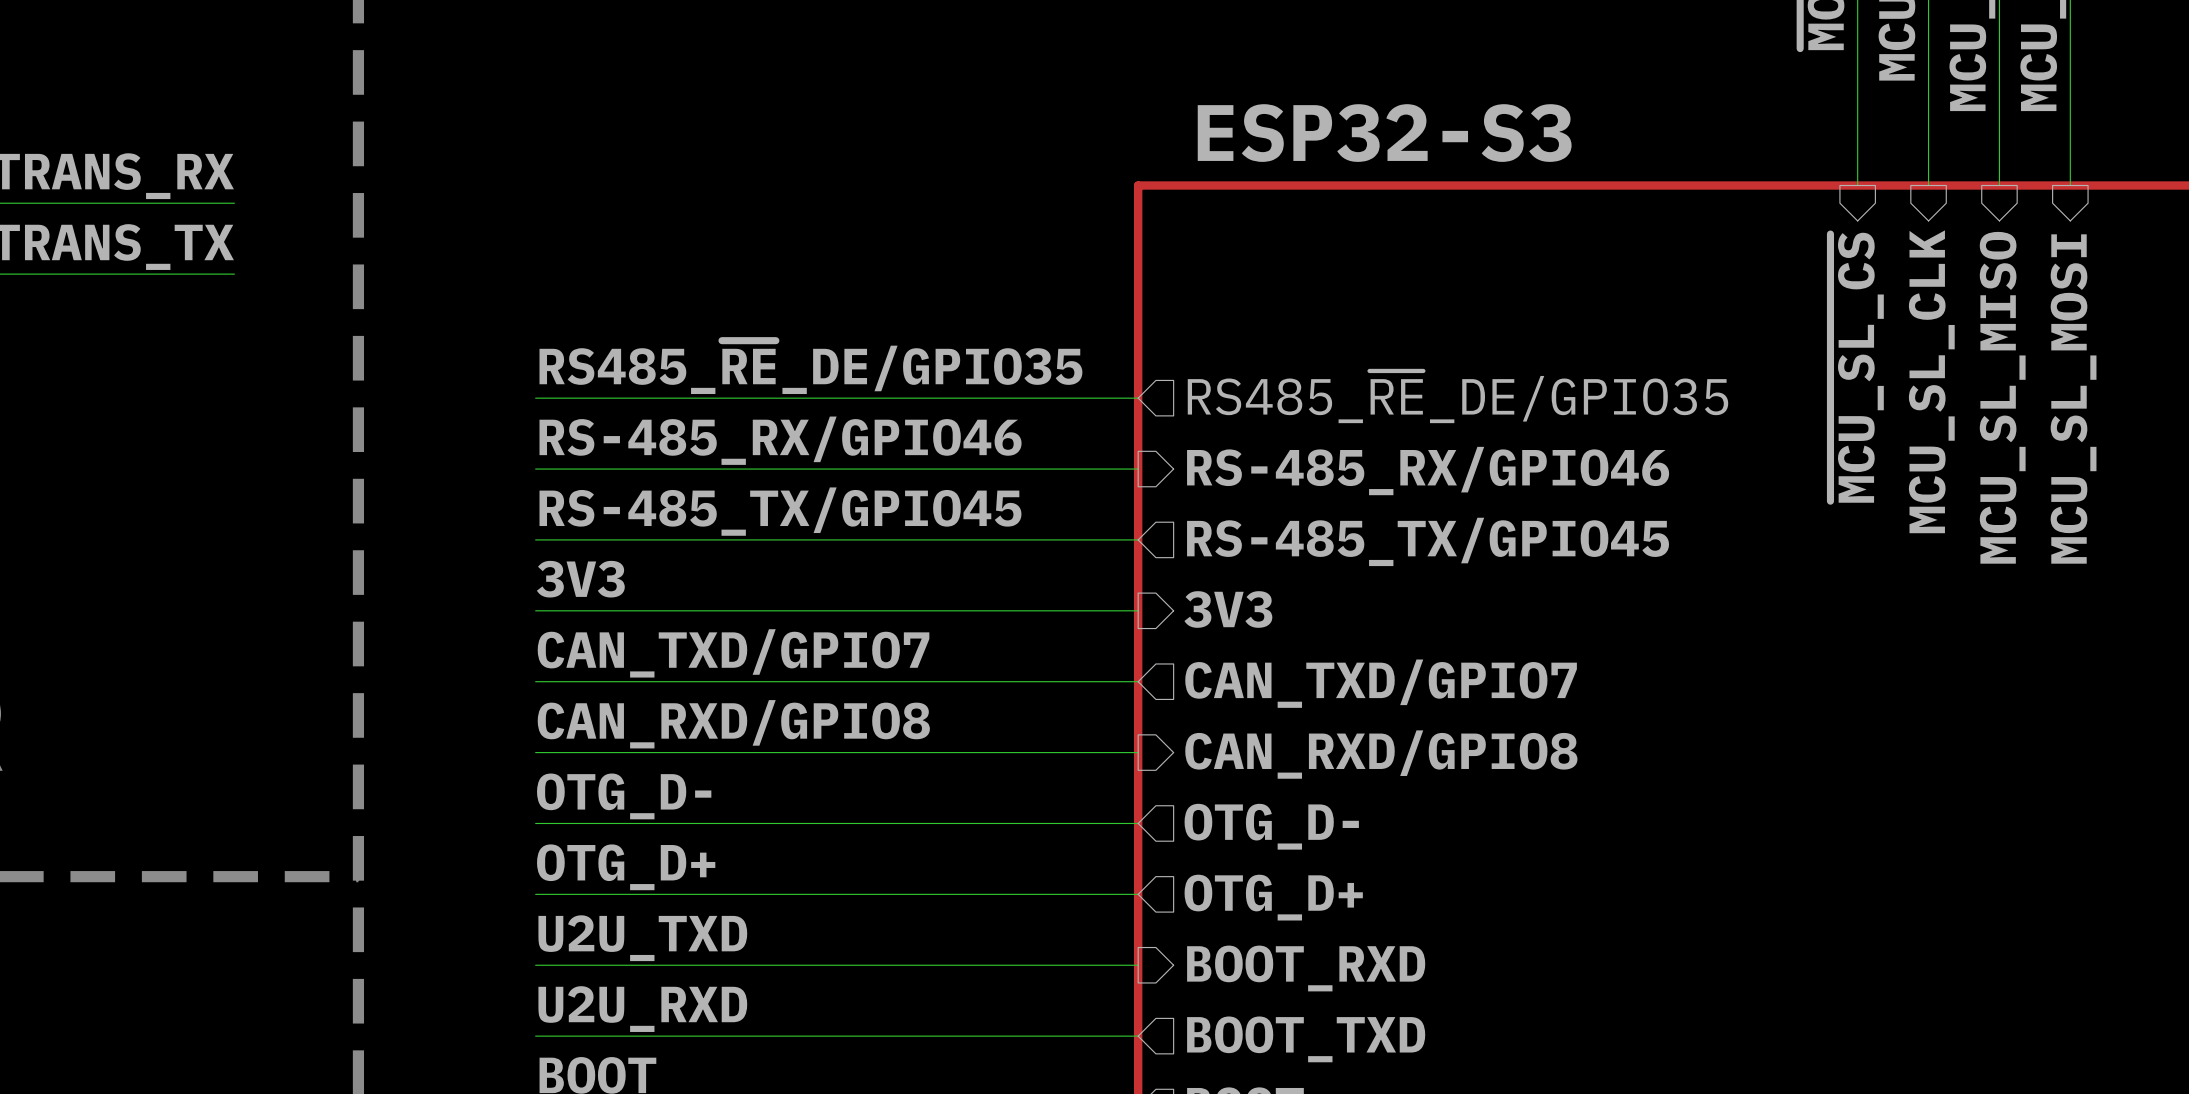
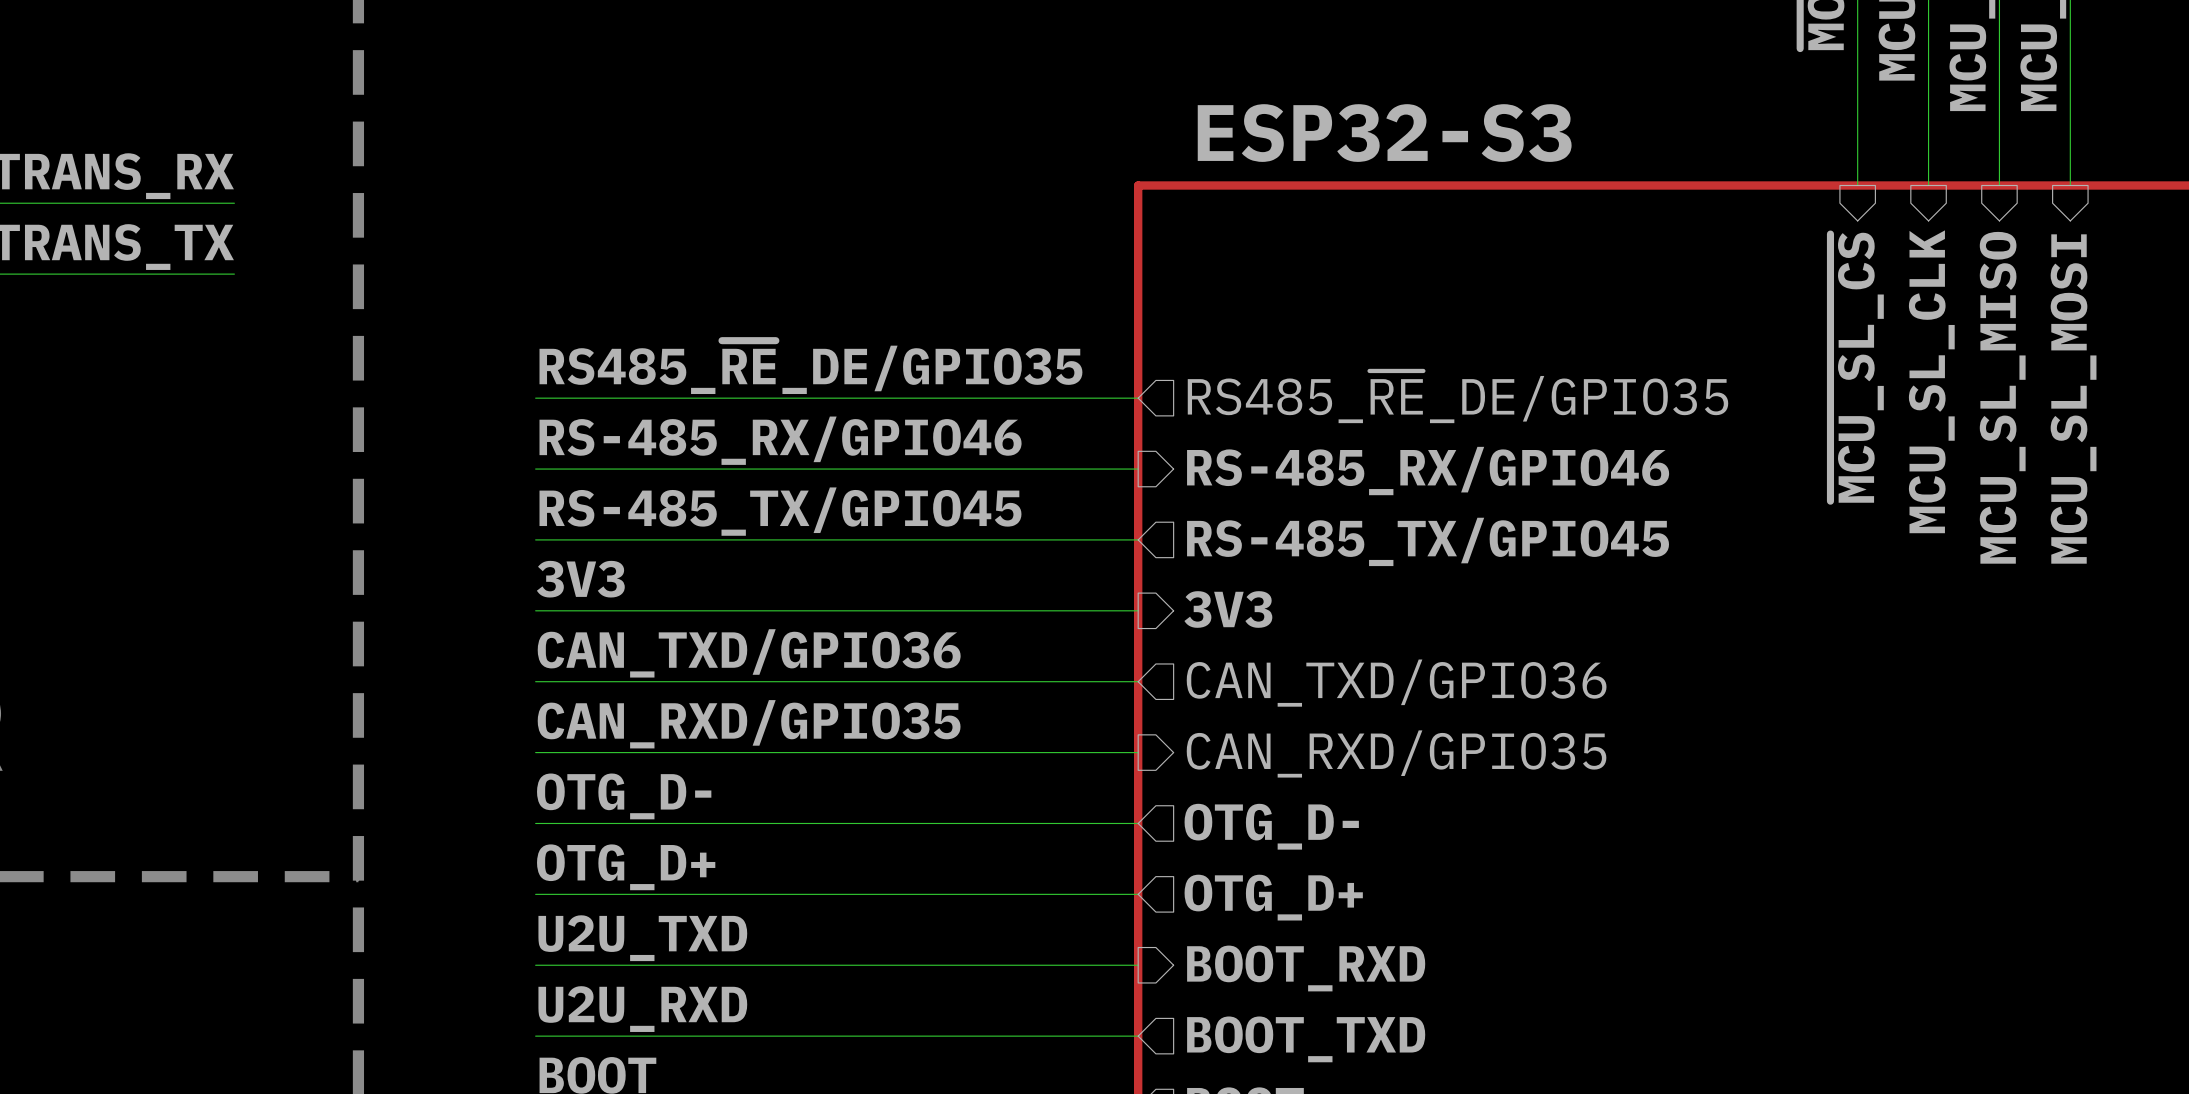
label: CAN_TXD/GPIO7 (733, 653) -> CAN_TXD/GPIO36 (749, 653)
sheet pin: CAN_TXD/GPIO7 (1381, 683) -> CAN_TXD/GPIO36 (1396, 683)
label: CAN_RXD/GPIO8 (733, 724) -> CAN_RXD/GPIO35 (749, 724)
sheet pin: CAN_RXD/GPIO8 (1381, 754) -> CAN_RXD/GPIO35 (1396, 753)

